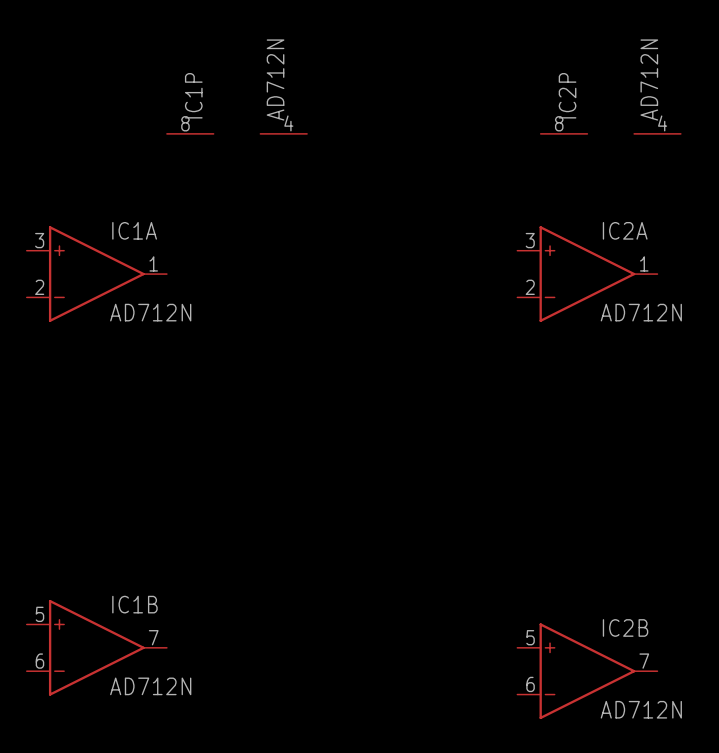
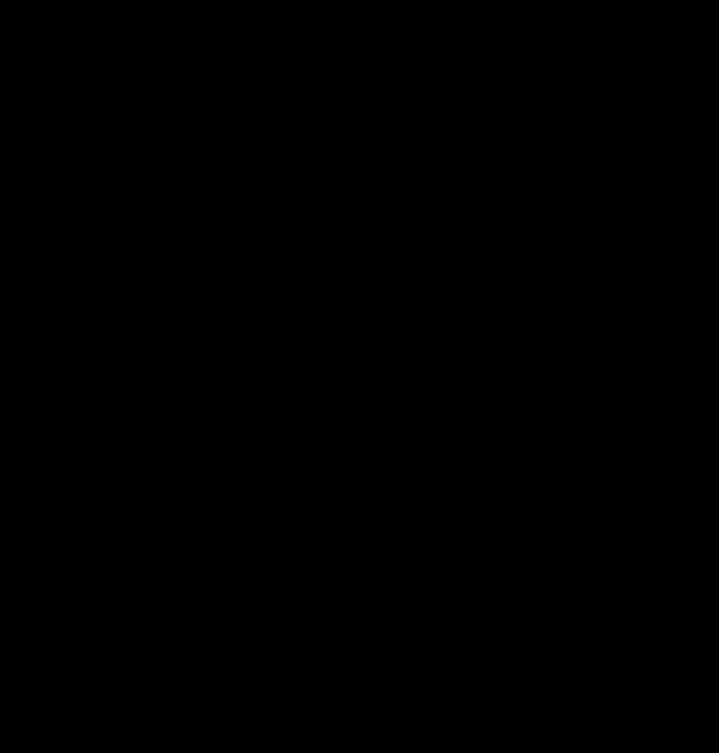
IC1P: AD712N (237, 133) -> none
IC2P: AD712N (610, 133) -> none
IC1A: AD712N (96, 274) -> none
IC2A: AD712N (587, 274) -> none
IC1B: AD712N (96, 647) -> none
IC2B: AD712N (587, 671) -> none

